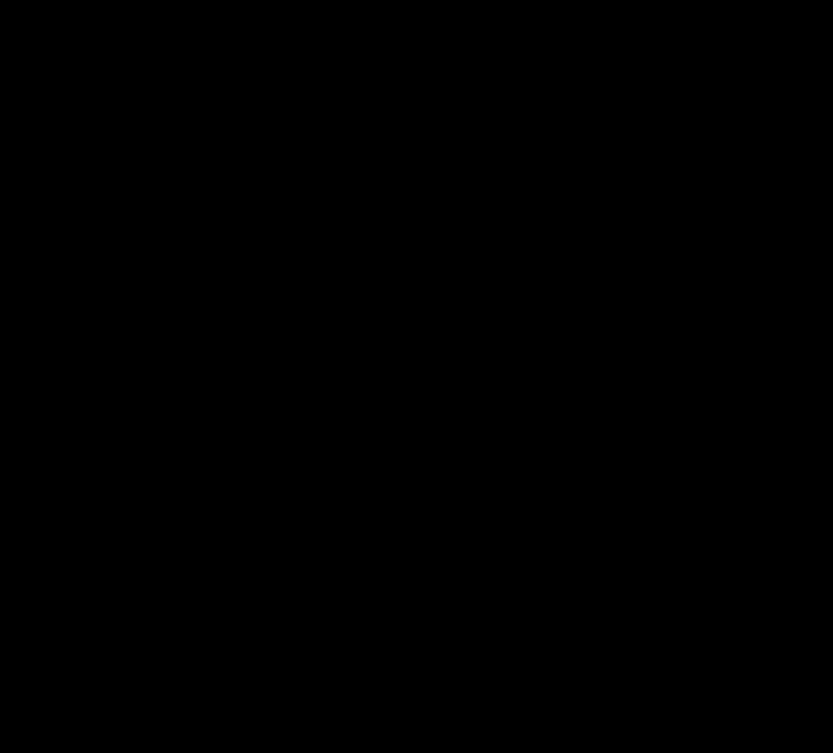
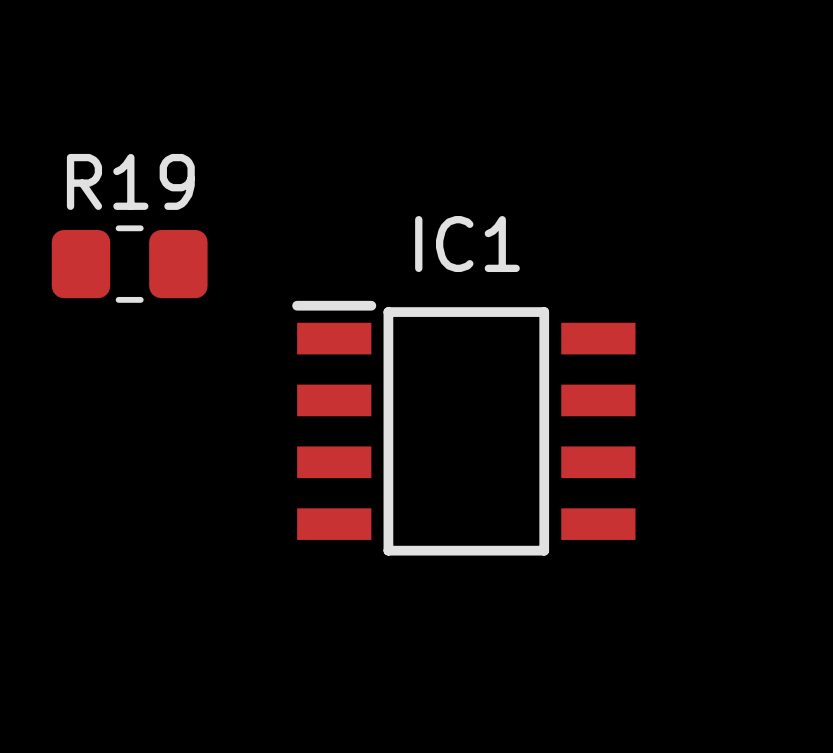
R19: none -> (129, 264)
IC1: none -> (463, 428)

